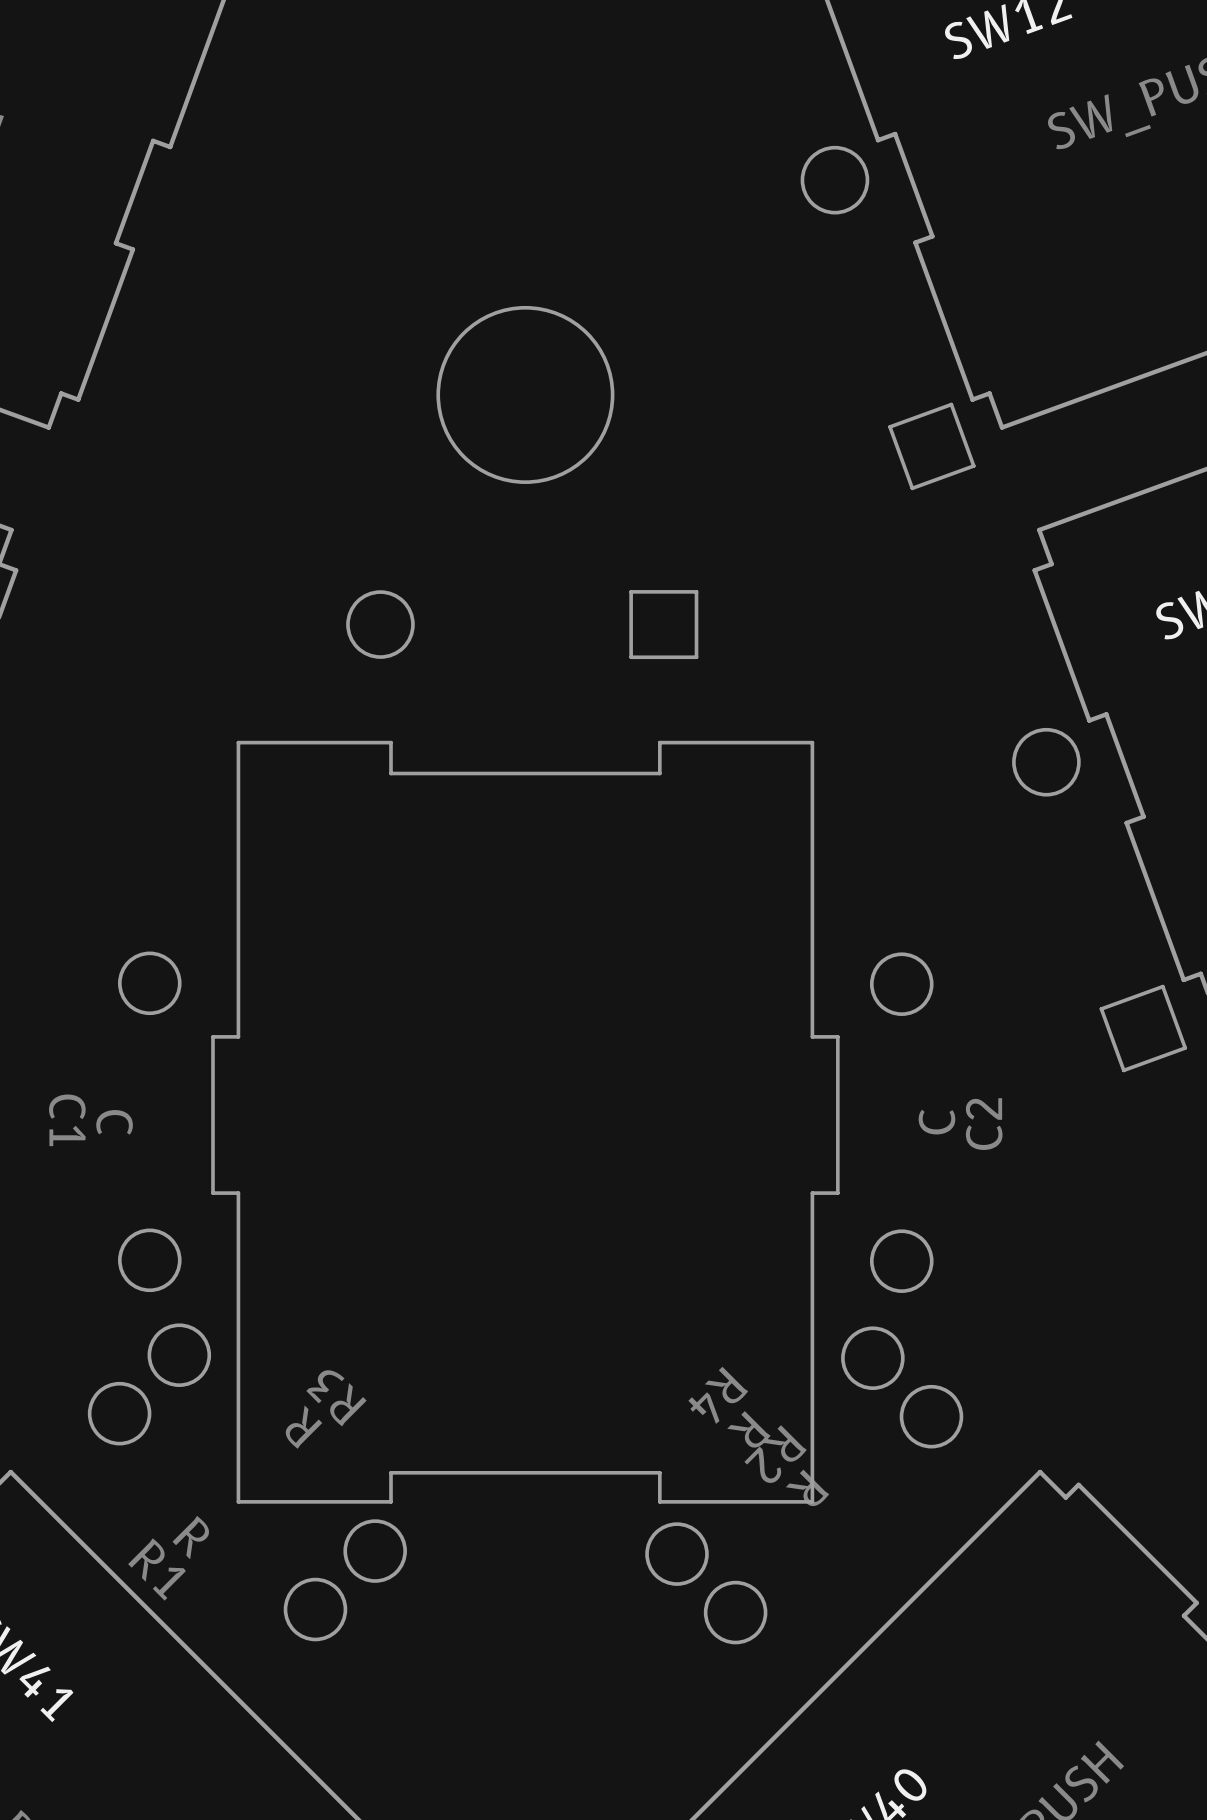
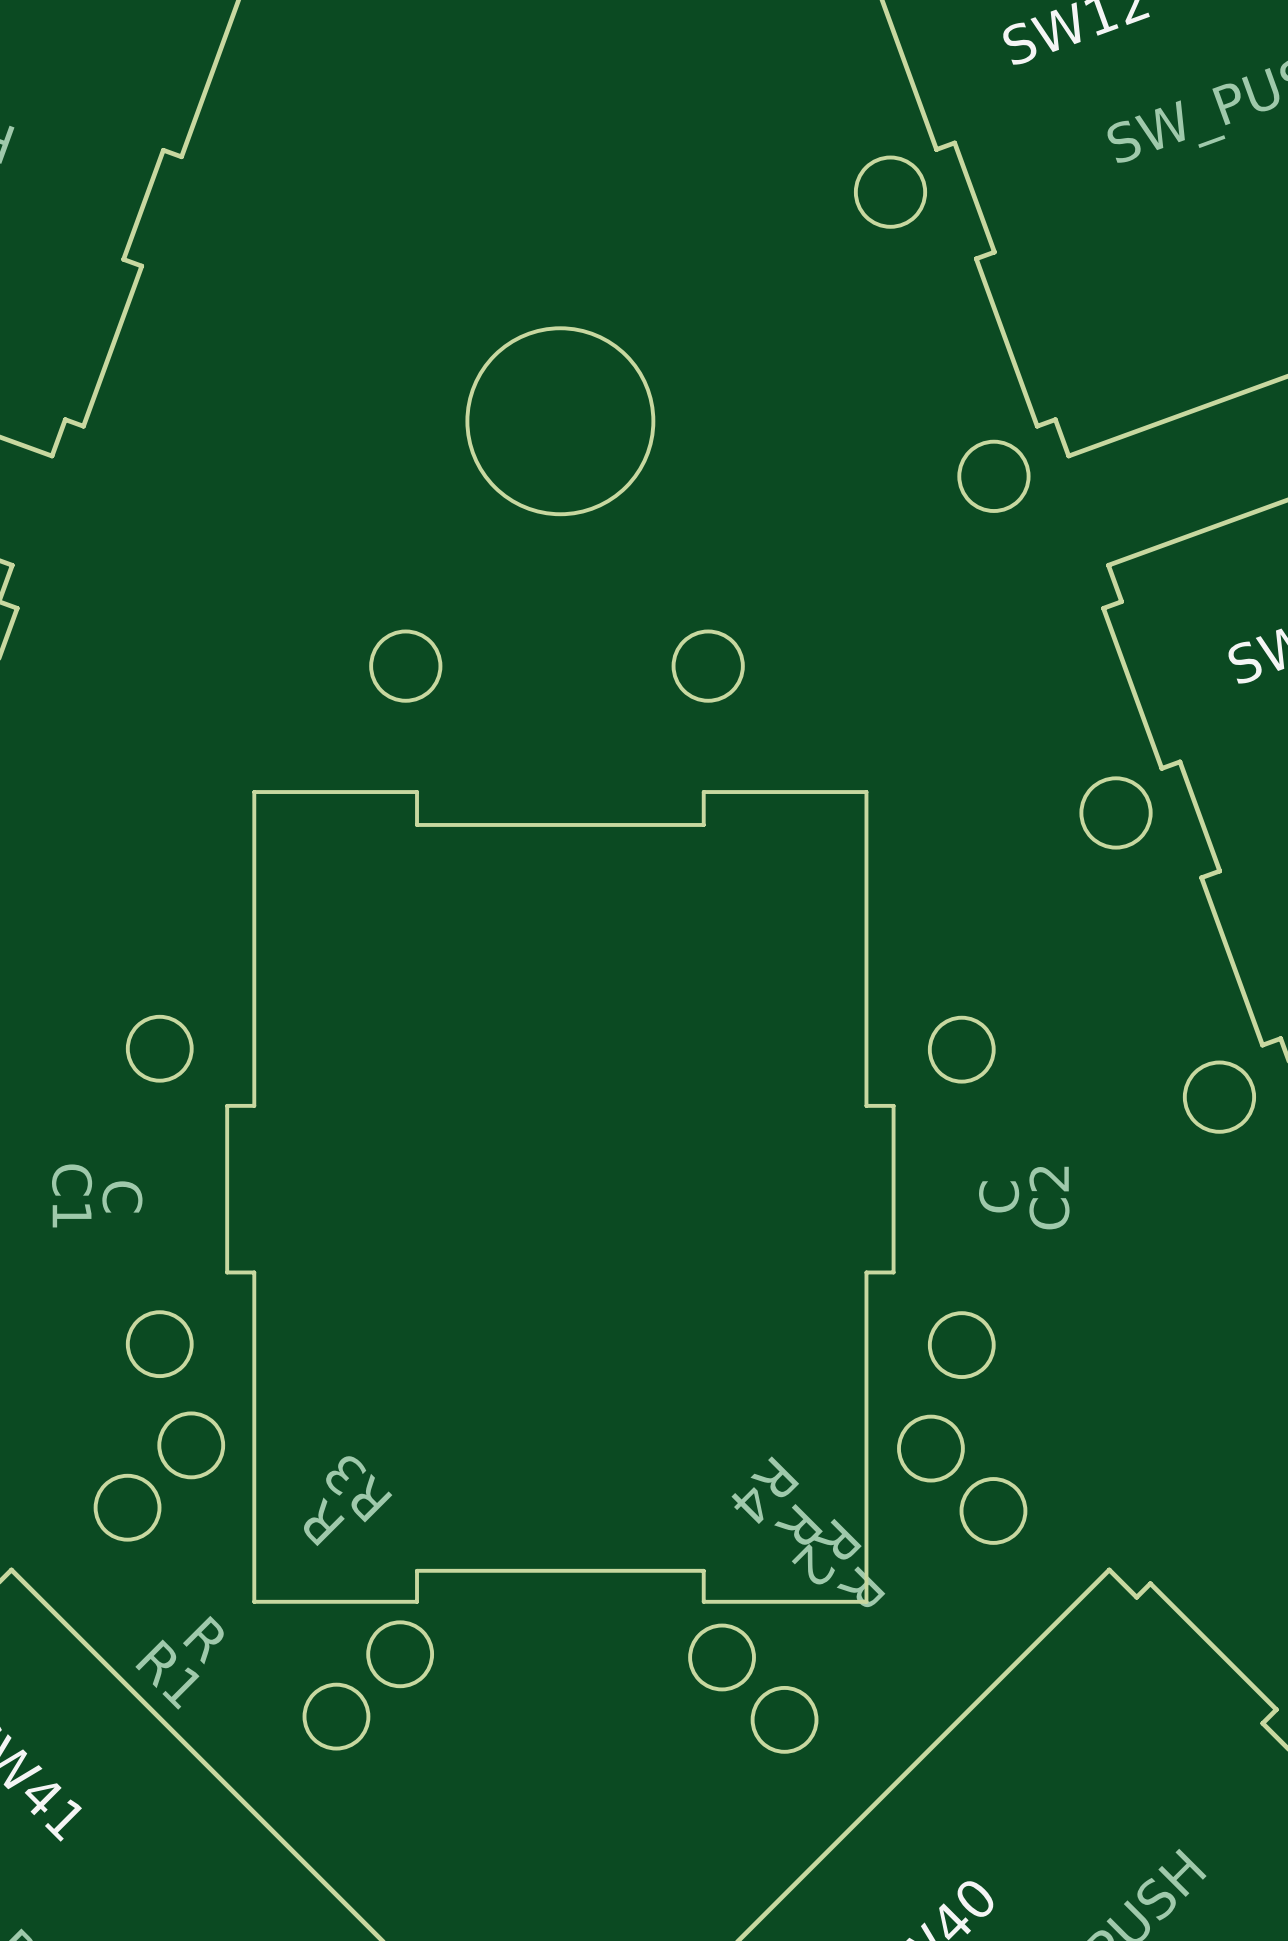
drawing shape: [800, 145, 976, 491] -> [853, 155, 1031, 513]
drawing shape: [346, 590, 699, 660] -> [369, 629, 745, 703]
drawing shape: [1012, 727, 1188, 1073] -> [1079, 776, 1257, 1134]

